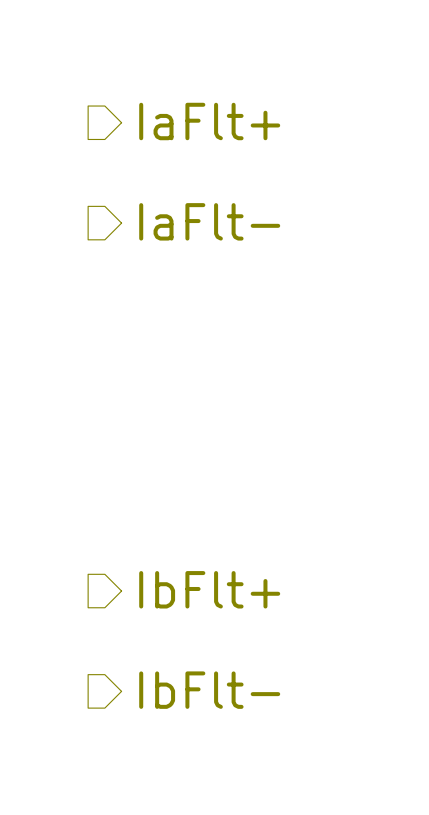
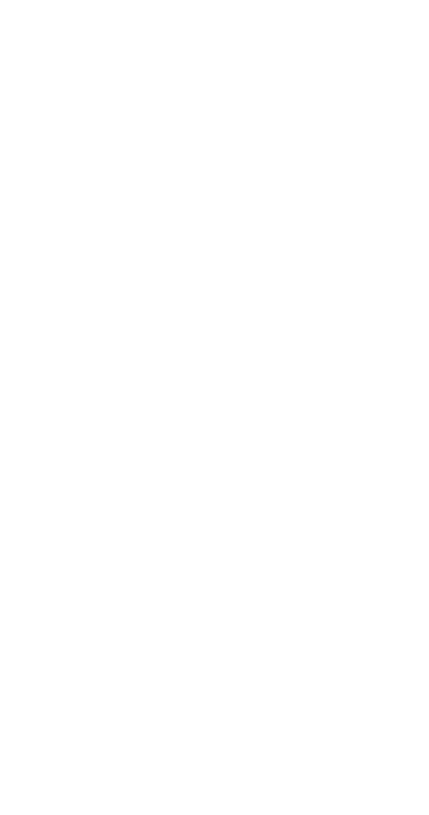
hierarchical label: IaFlt+ (209, 121) -> none
hierarchical label: IaFlt- (209, 221) -> none
hierarchical label: IbFlt+ (209, 589) -> none
hierarchical label: IbFlt- (209, 690) -> none

